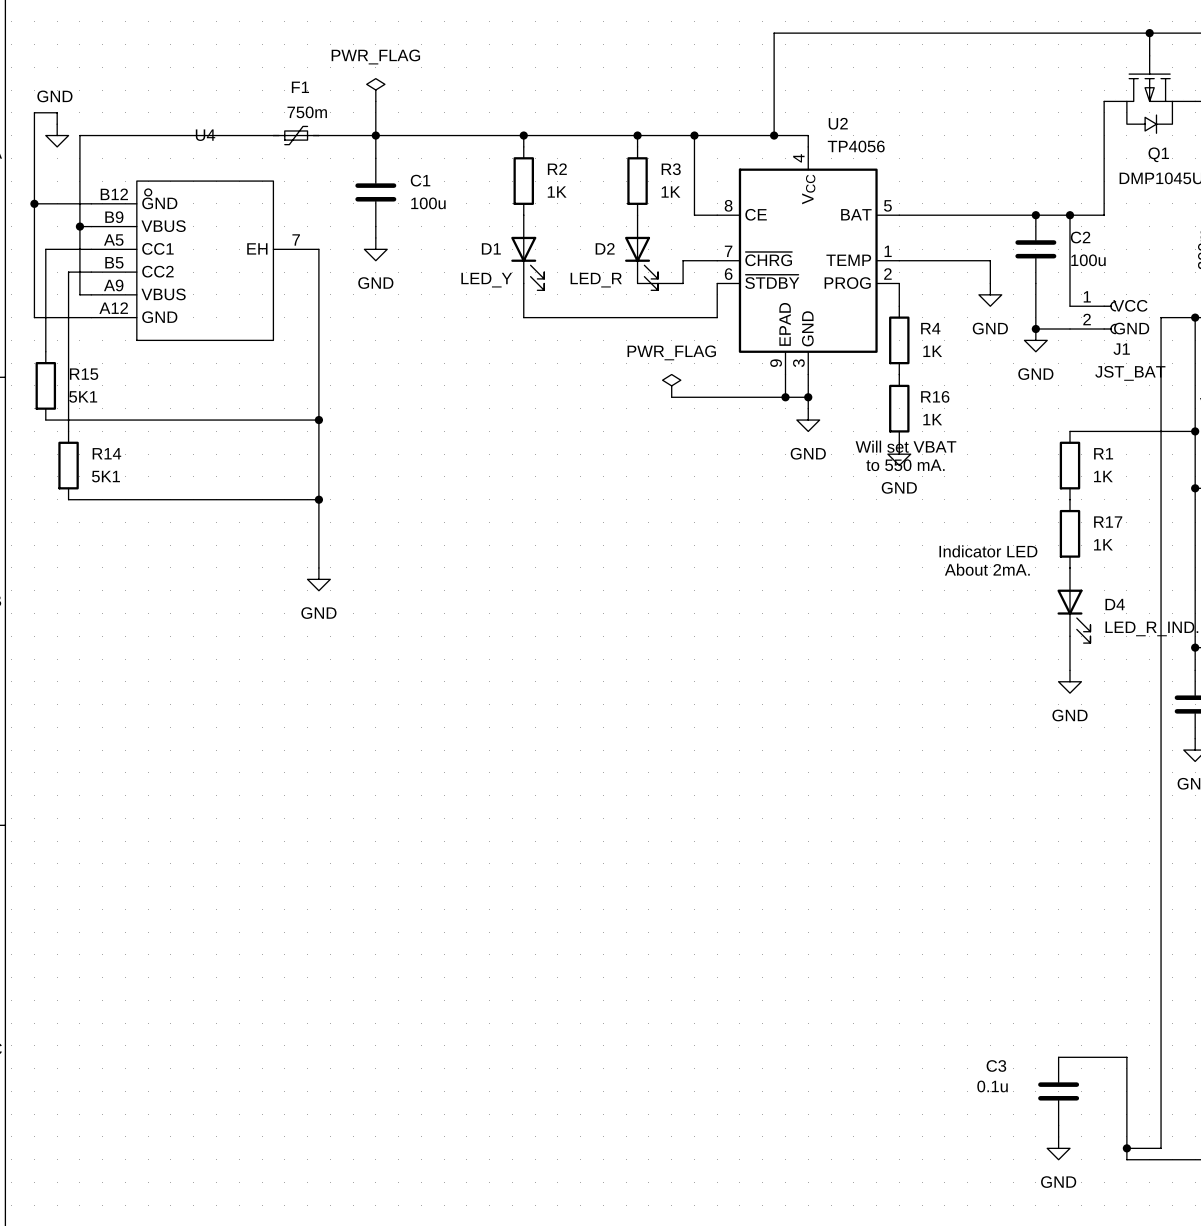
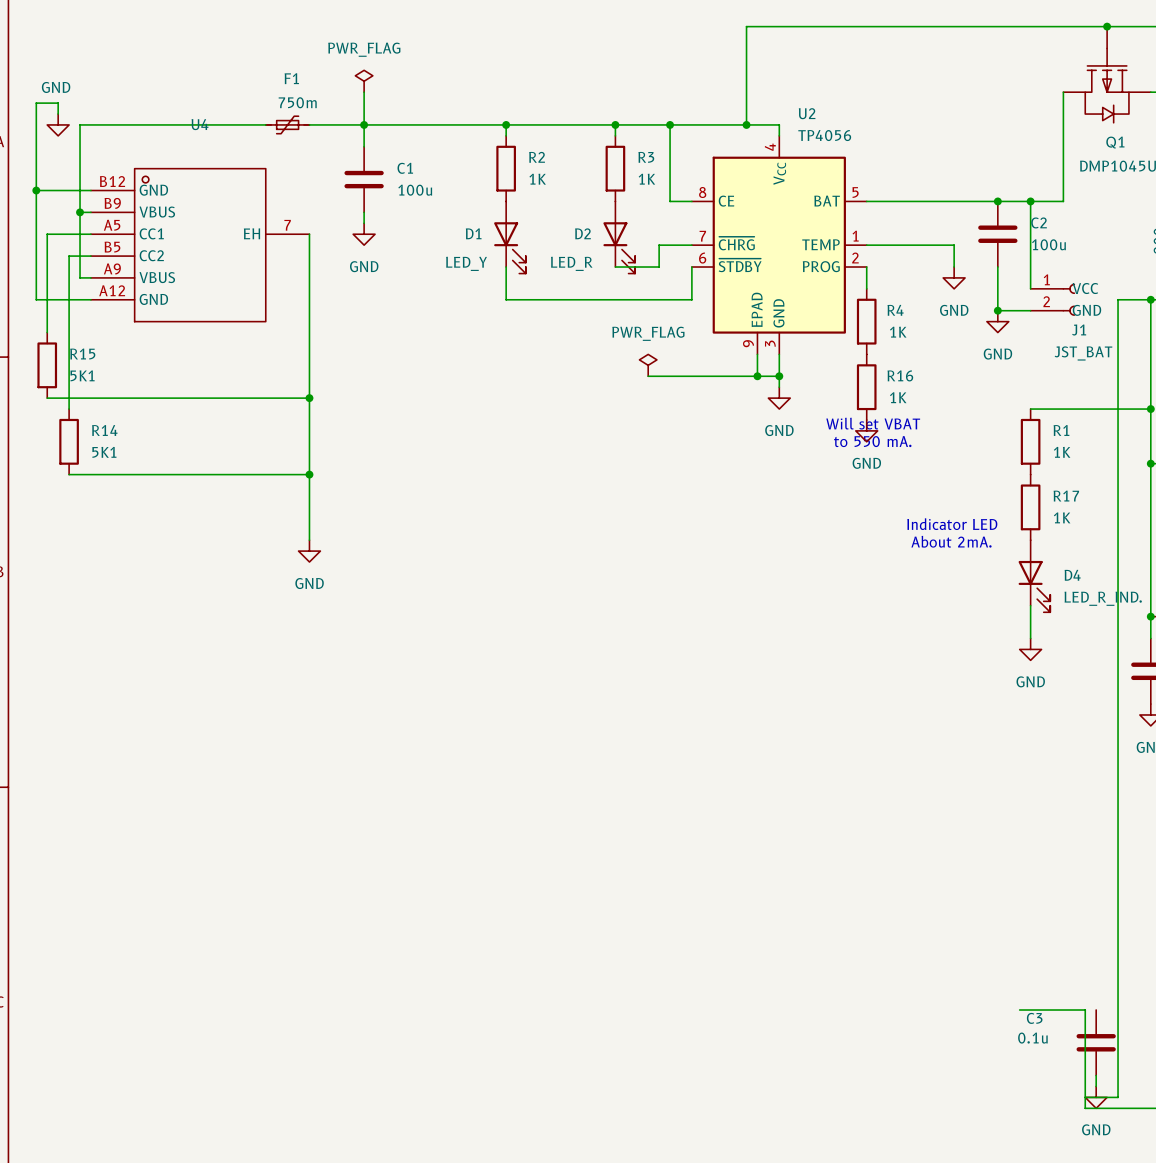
C3 position: (1058, 1091) -> (1096, 1042)
wire: (1058, 1125) (1058, 1136) -> (1096, 1075) (1096, 1086)
power symbol position: GND (1058, 1148) -> GND (1096, 1097)
junction: (1126, 1148) -> none

